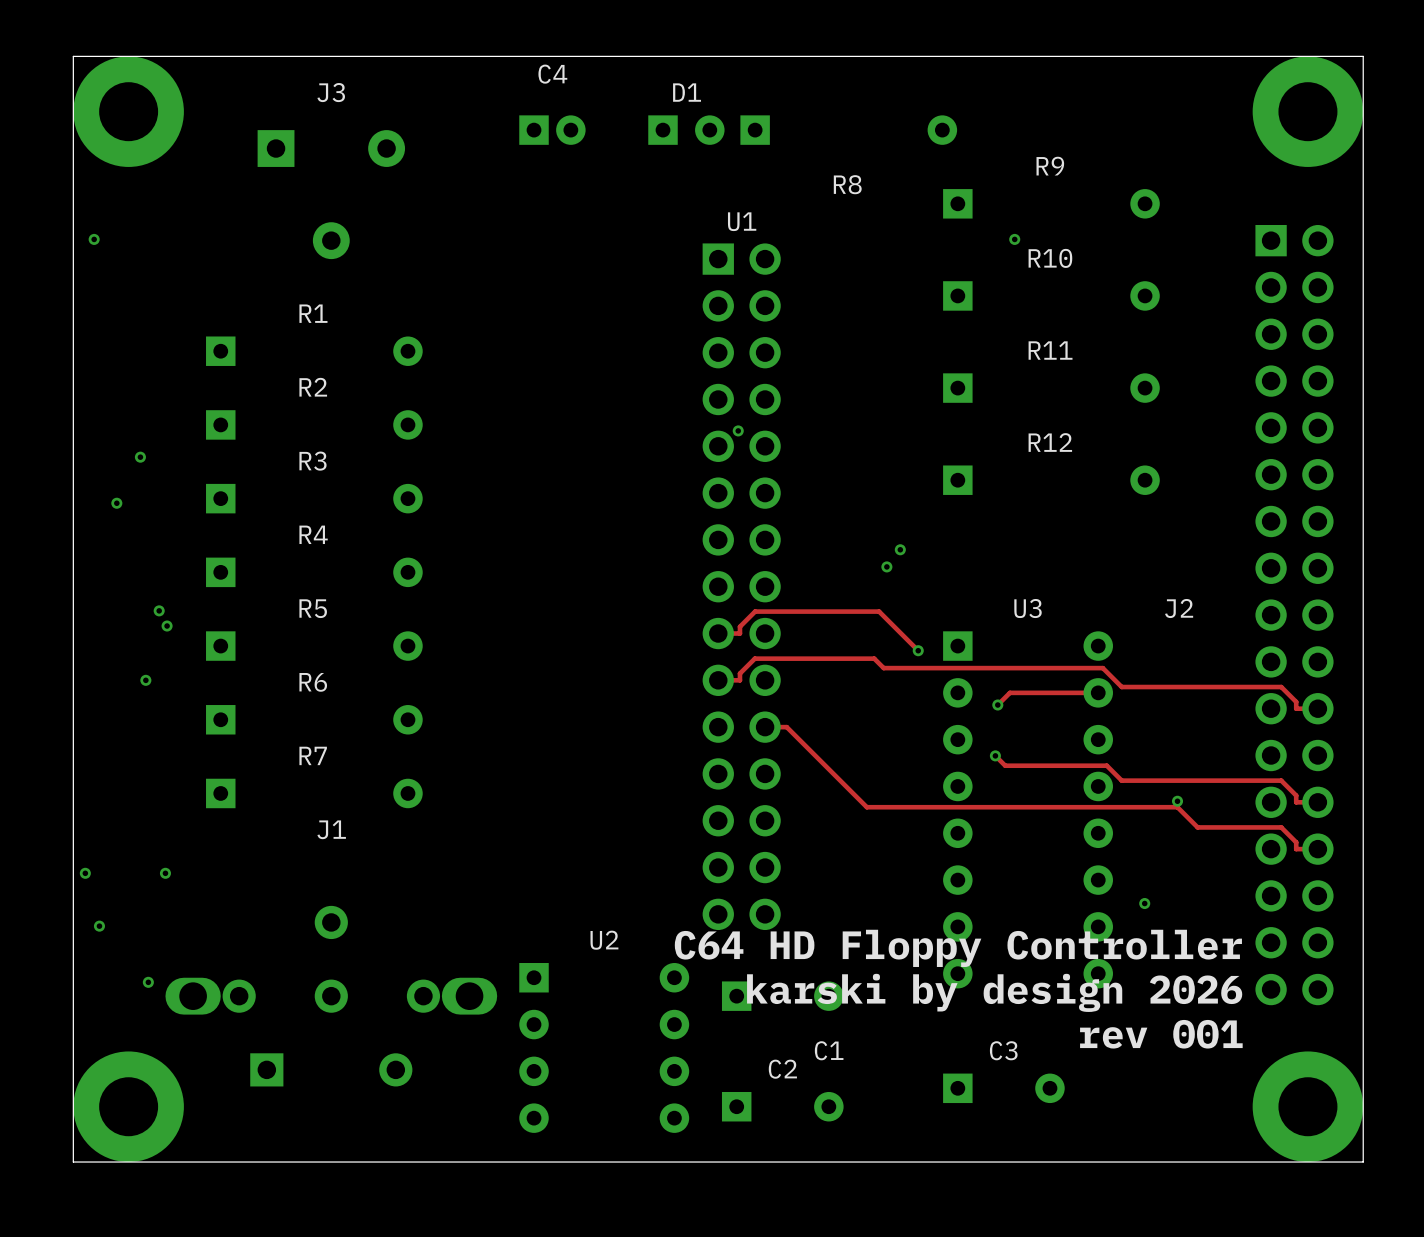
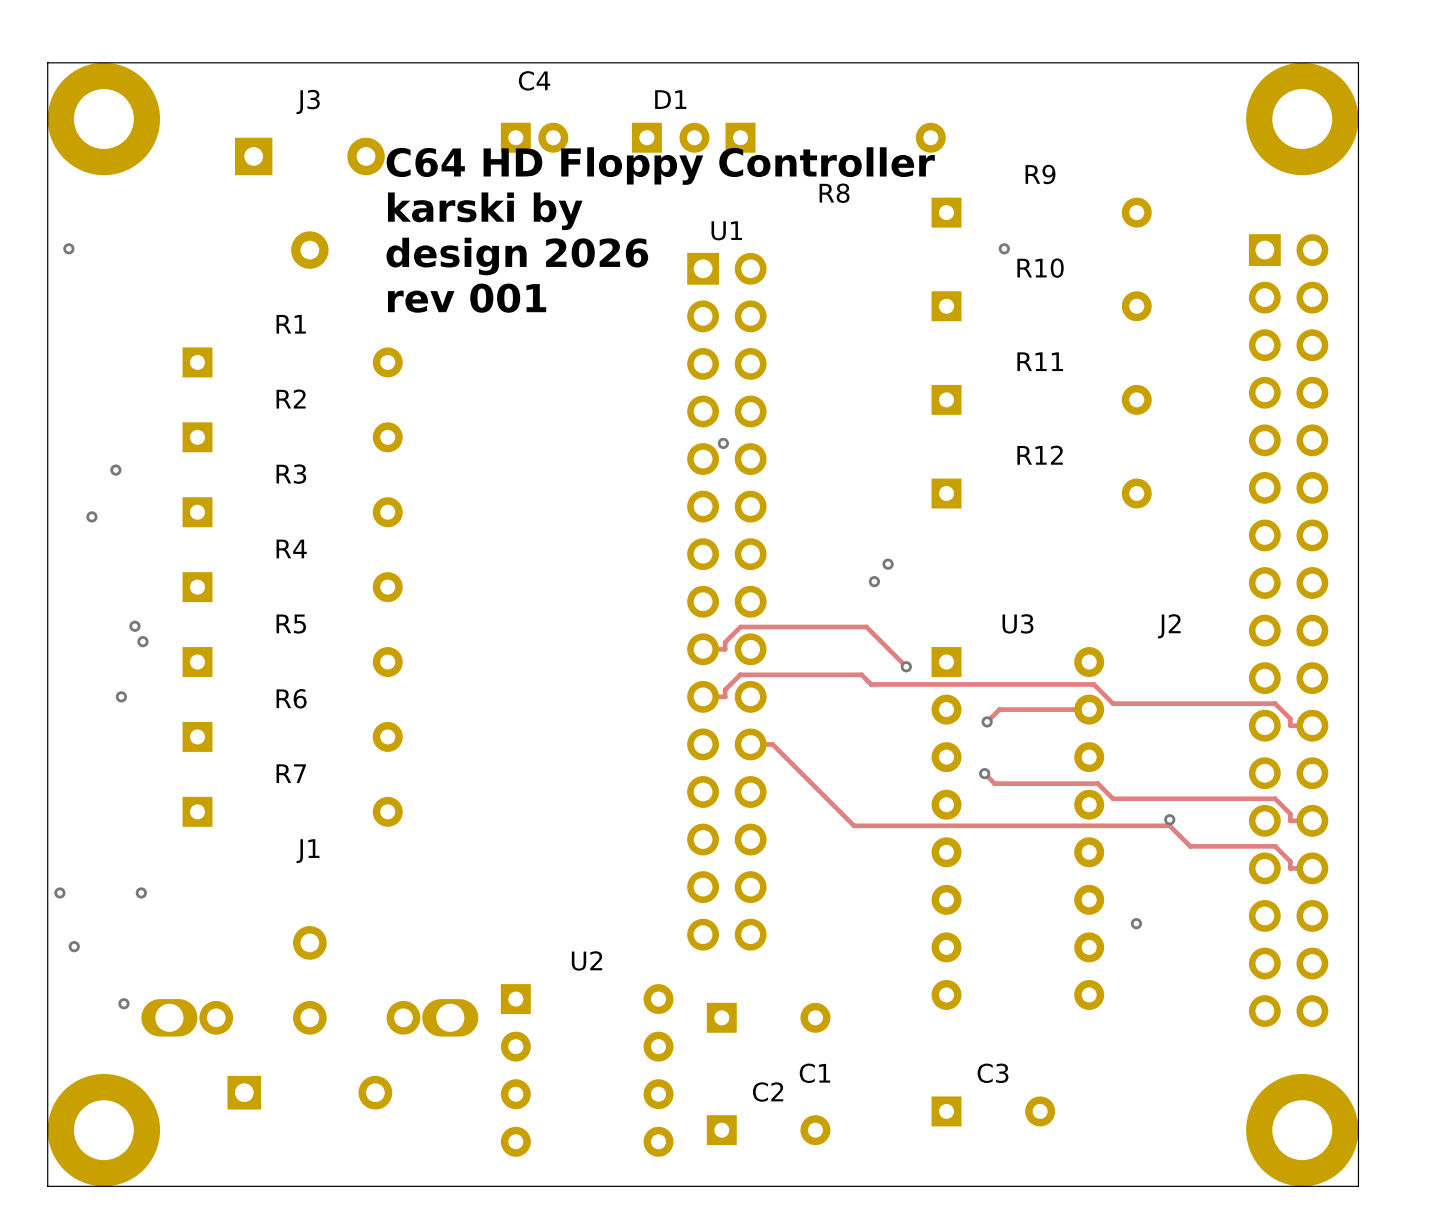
text: none -> C64 HD Floppy Controller (660, 166)
text: none -> karski by (485, 211)
text: none -> design 2026 (517, 256)
text: none -> rev 001 (467, 298)
text: C64 HD Floppy Controller (958, 948) -> none
text: karski by design 2026 (994, 992) -> none
text: rev 001 (1161, 1034) -> none

